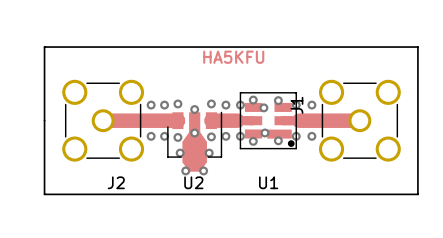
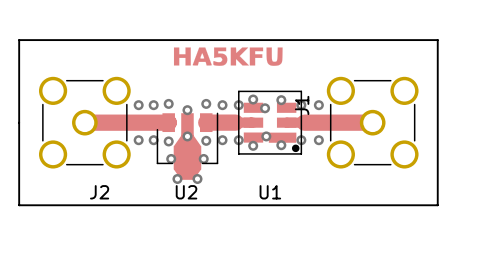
drawing: none -> [173, 47, 283, 66]
text: HA5KFU (233, 57) -> none

